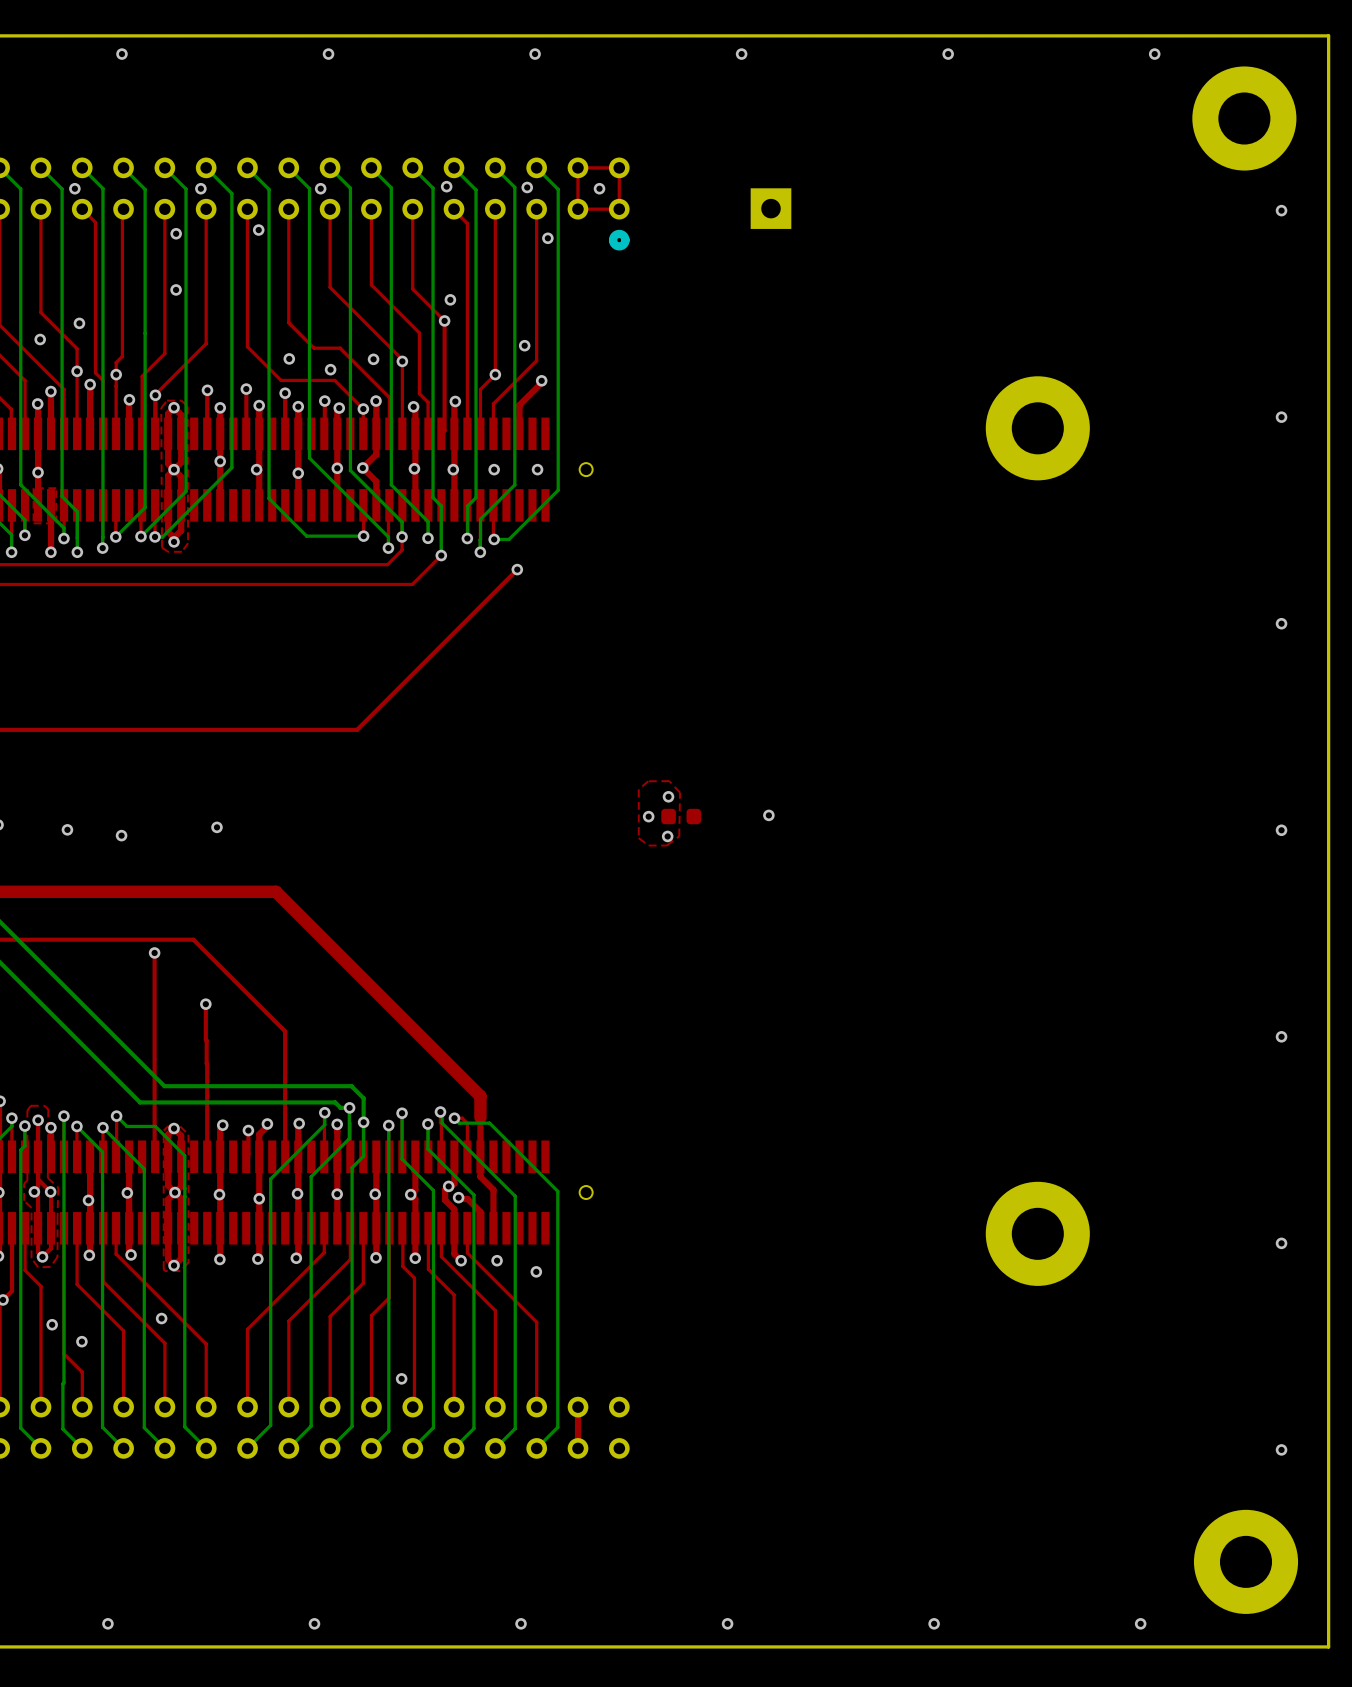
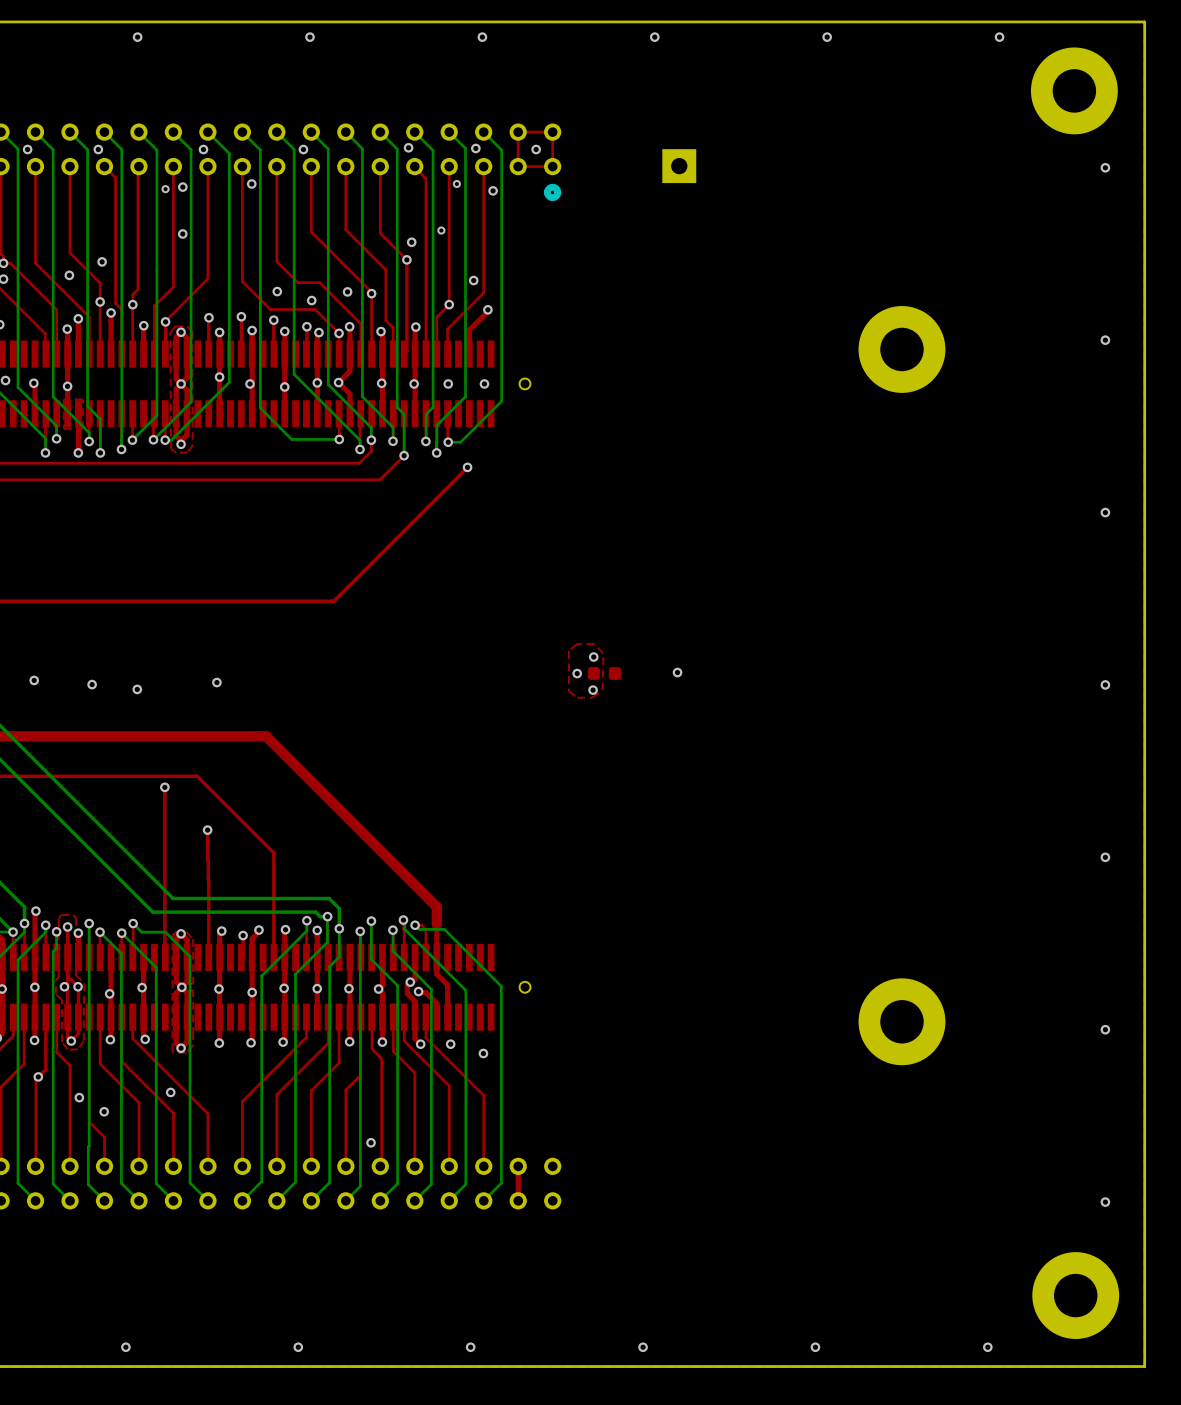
via: none -> (456, 183)
via: none -> (165, 189)
via: none -> (441, 230)

